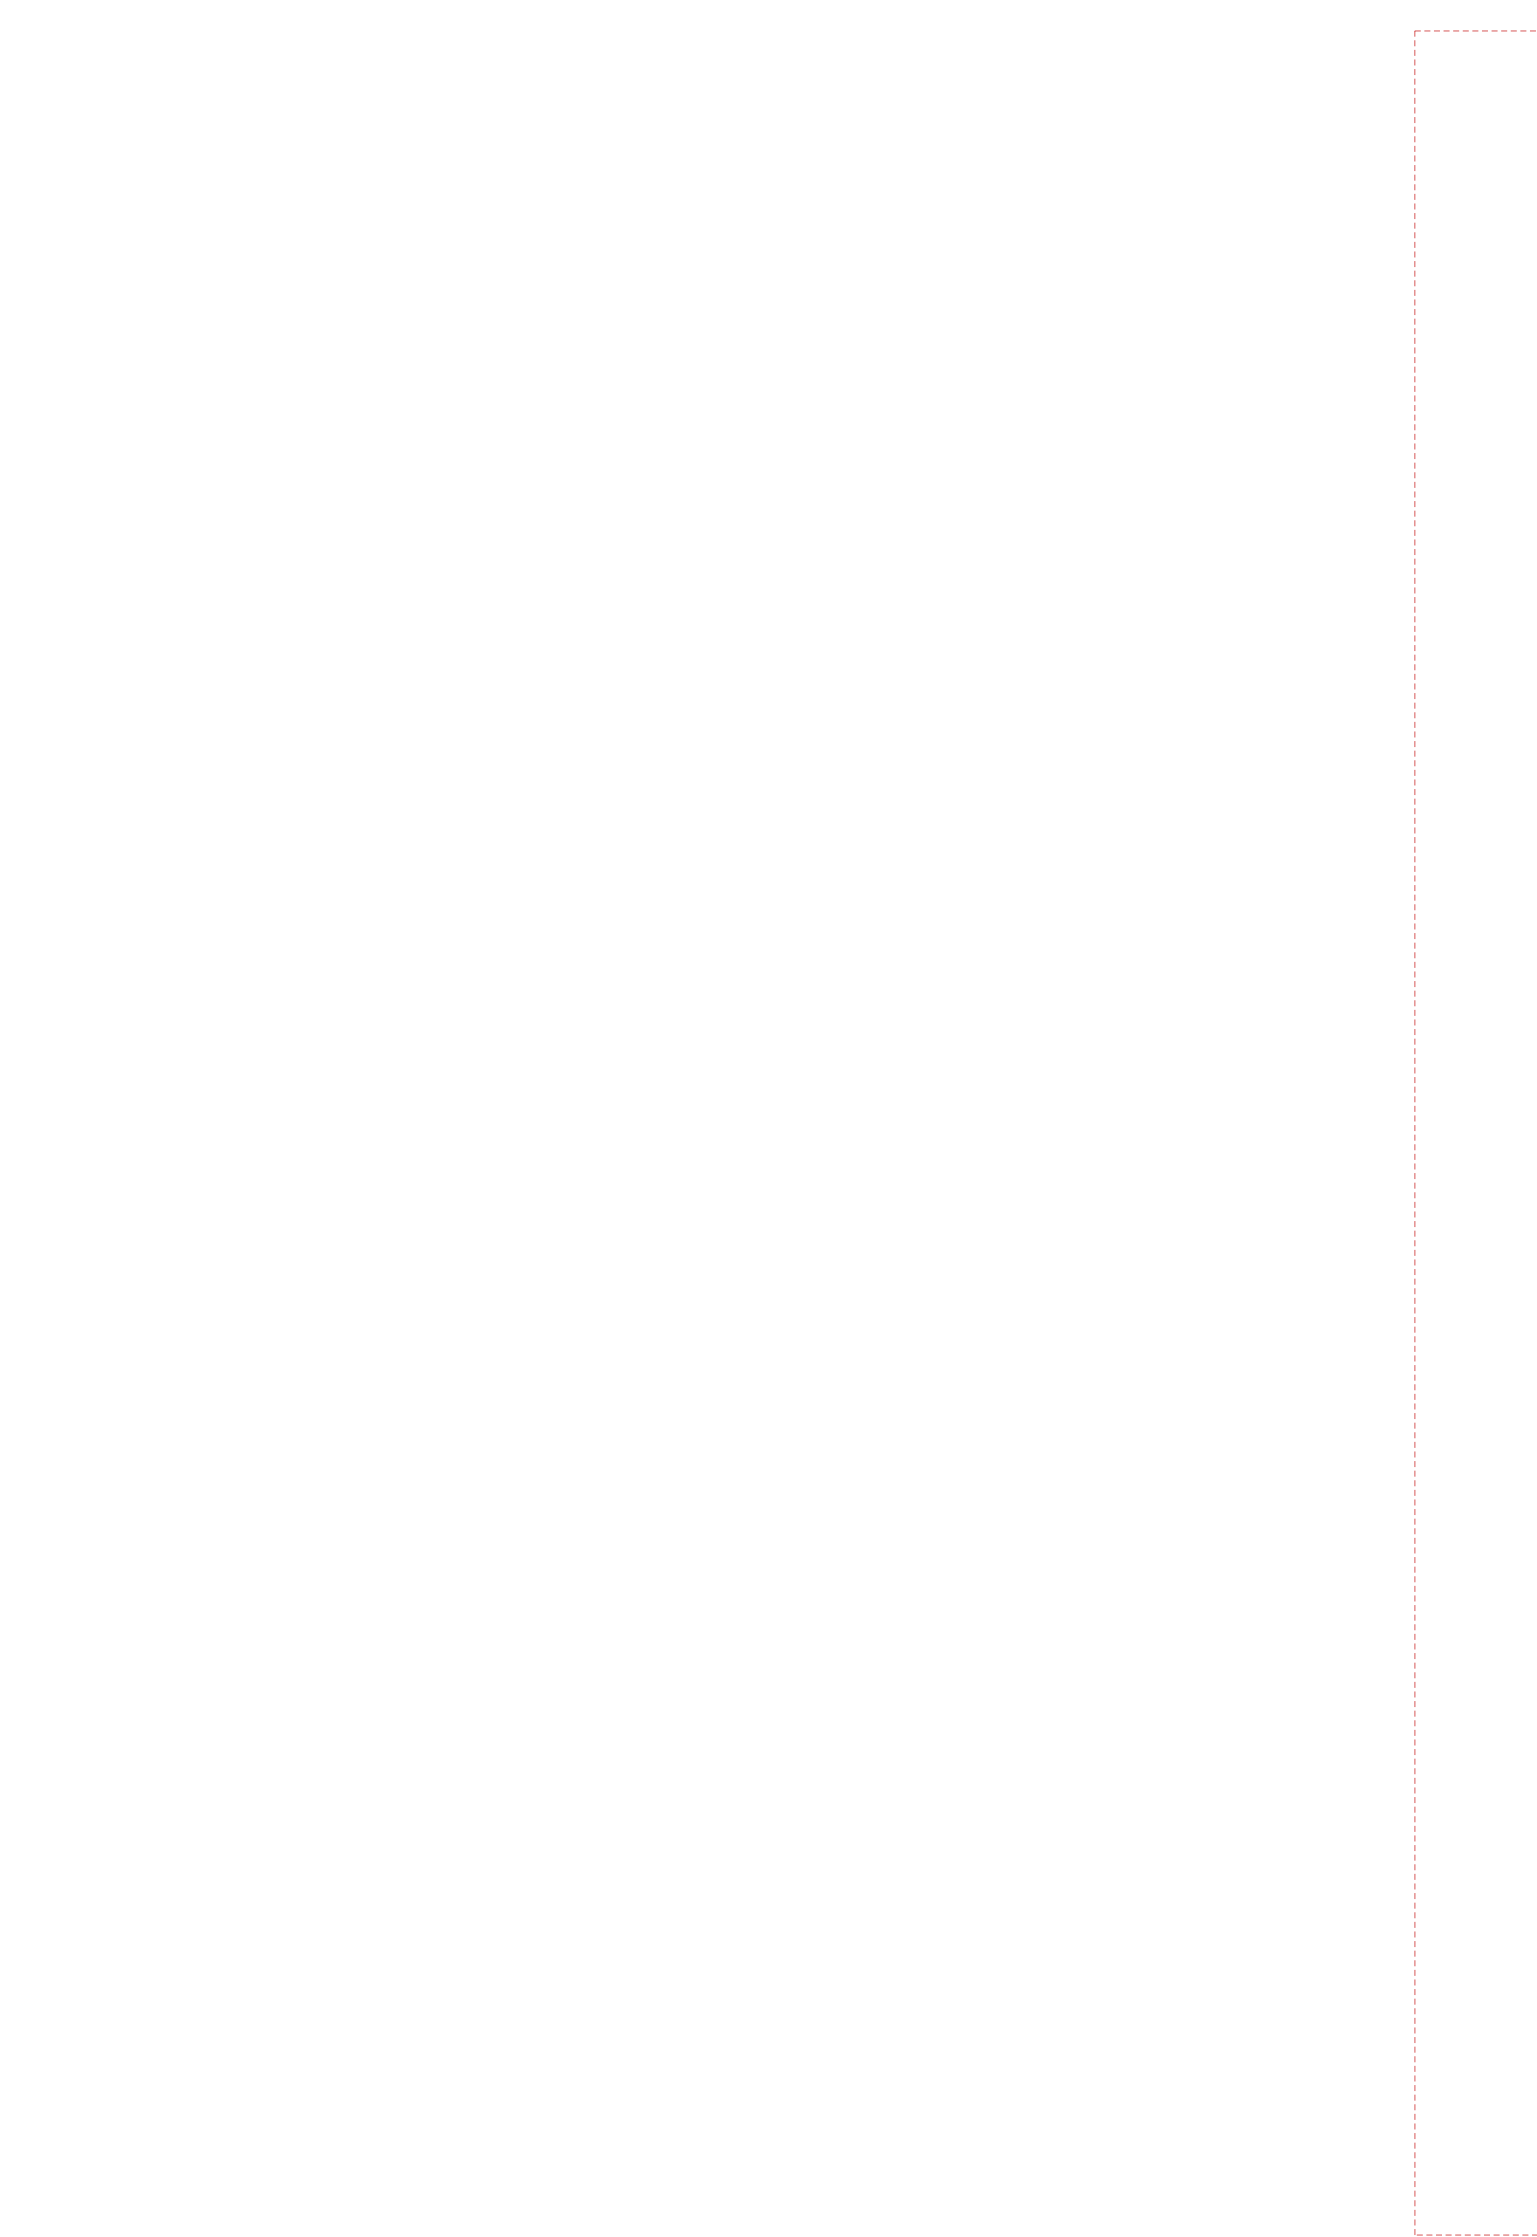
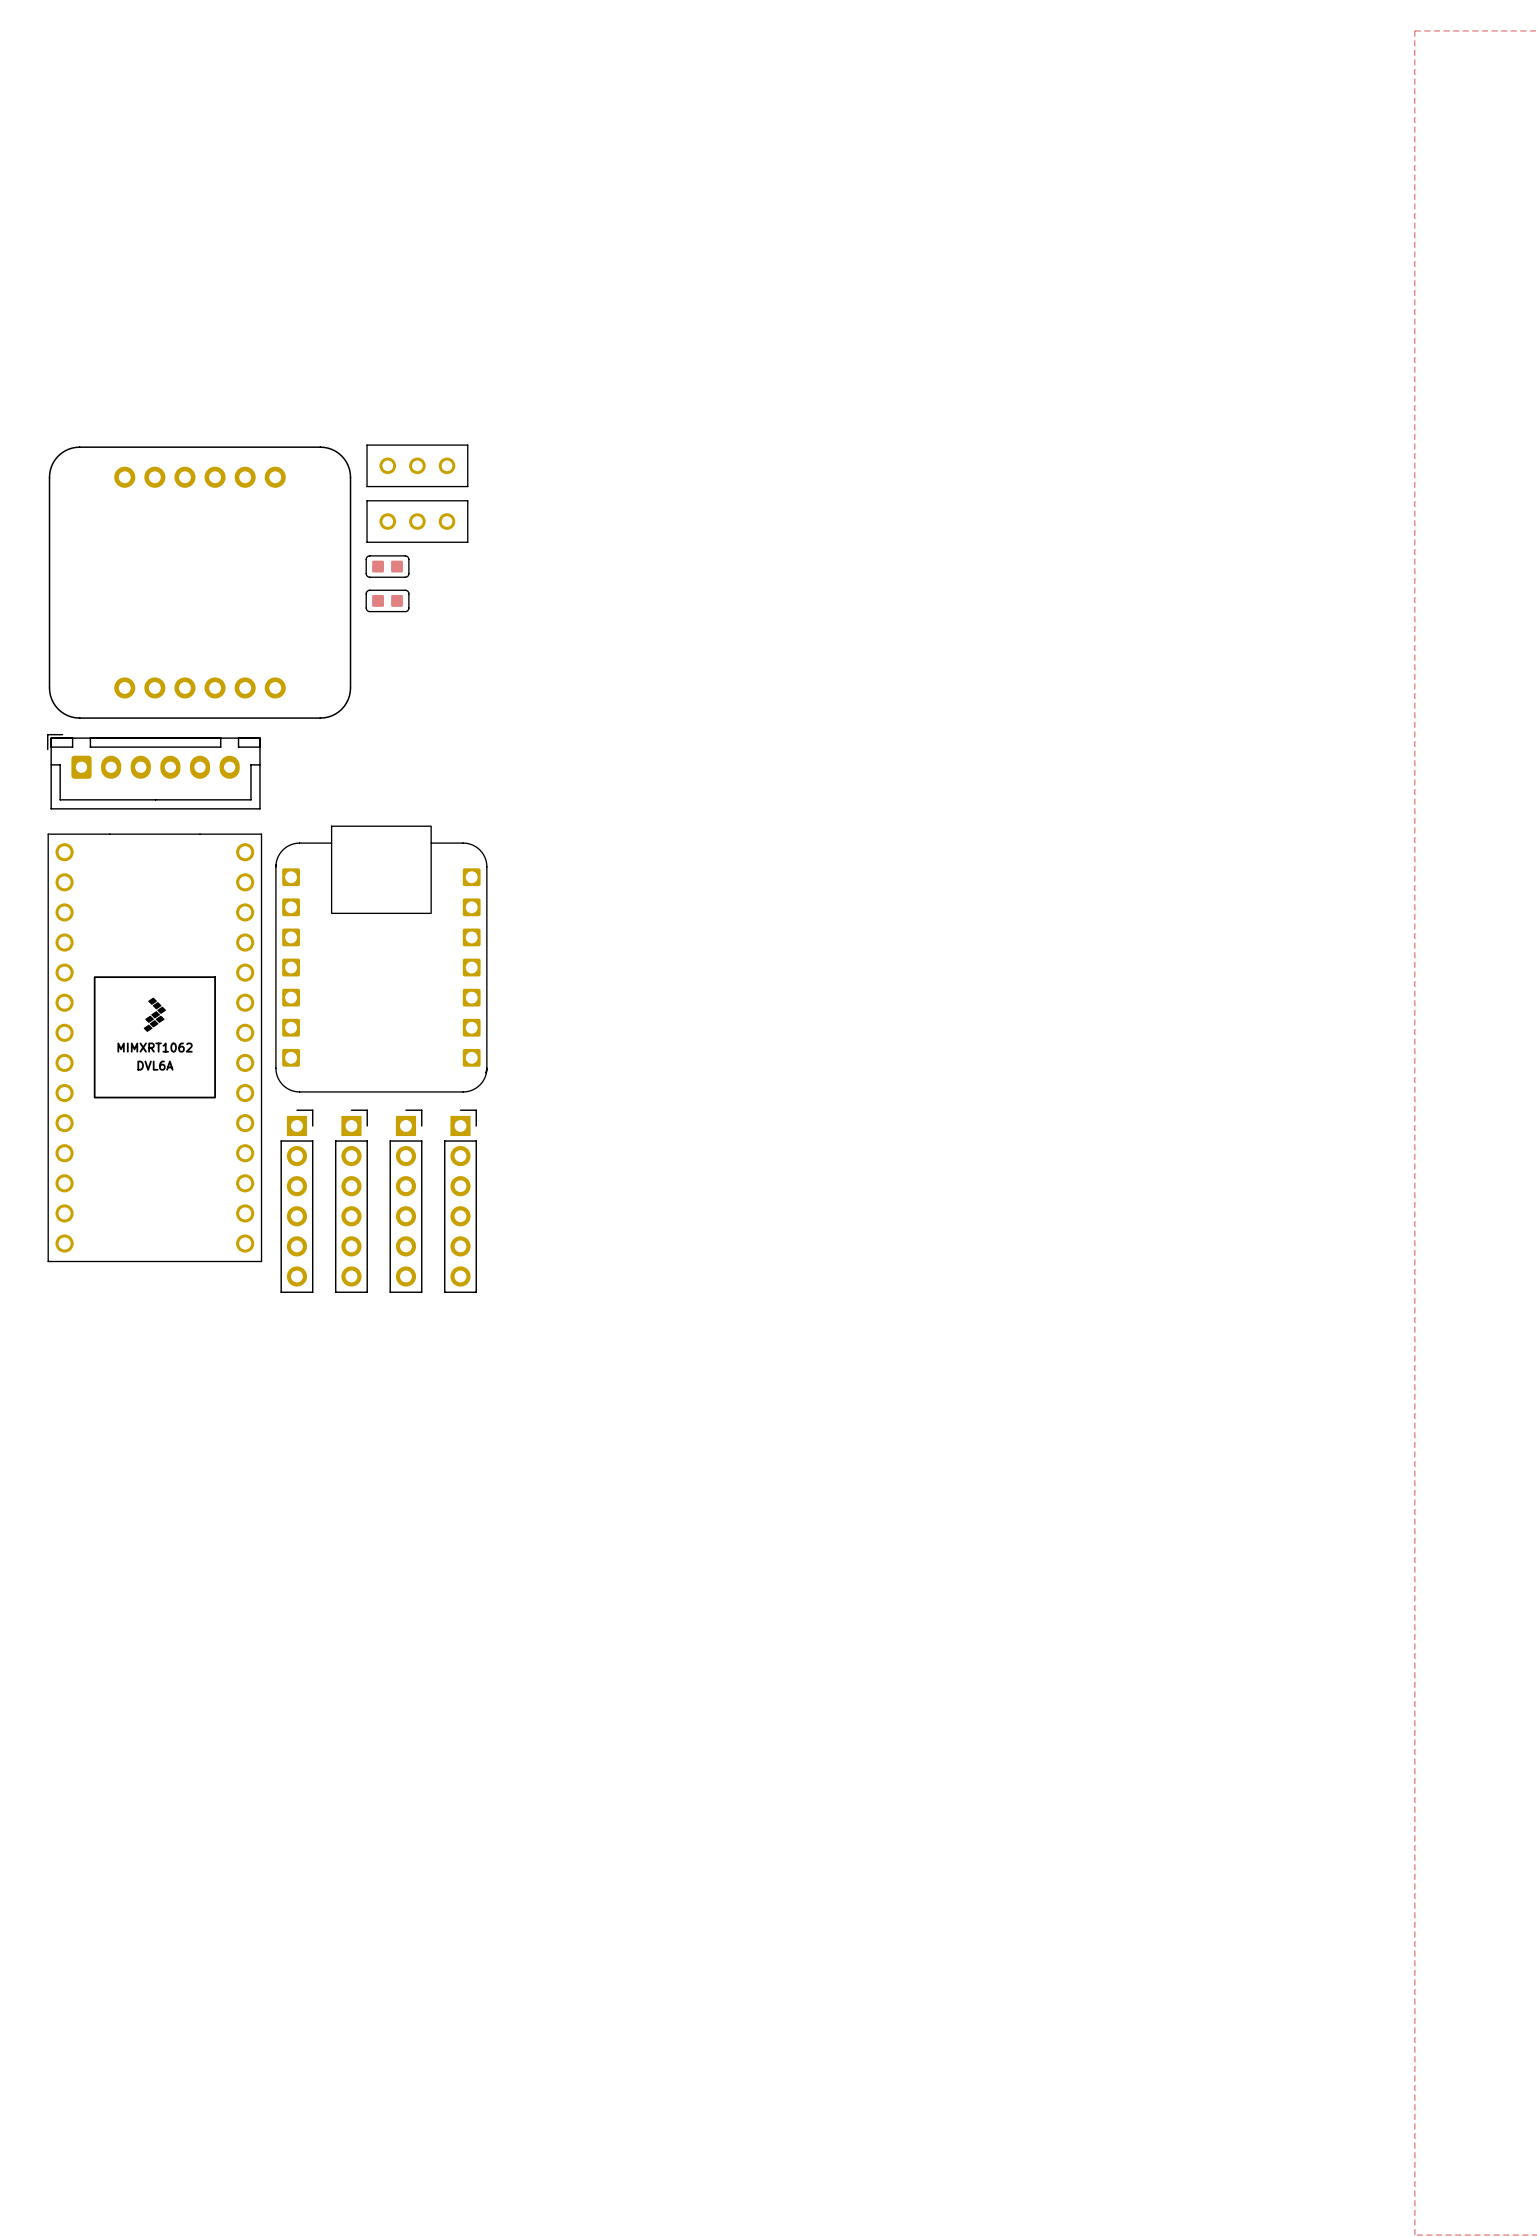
part: none -> (417, 465)
part: none -> (417, 521)
part: none -> (387, 566)
part: none -> (200, 582)
part: none -> (387, 600)
part: none -> (153, 771)
part: none -> (381, 959)
part: none -> (154, 1047)
part: none -> (296, 1201)
part: none -> (351, 1201)
part: none -> (405, 1201)
part: none -> (460, 1201)

